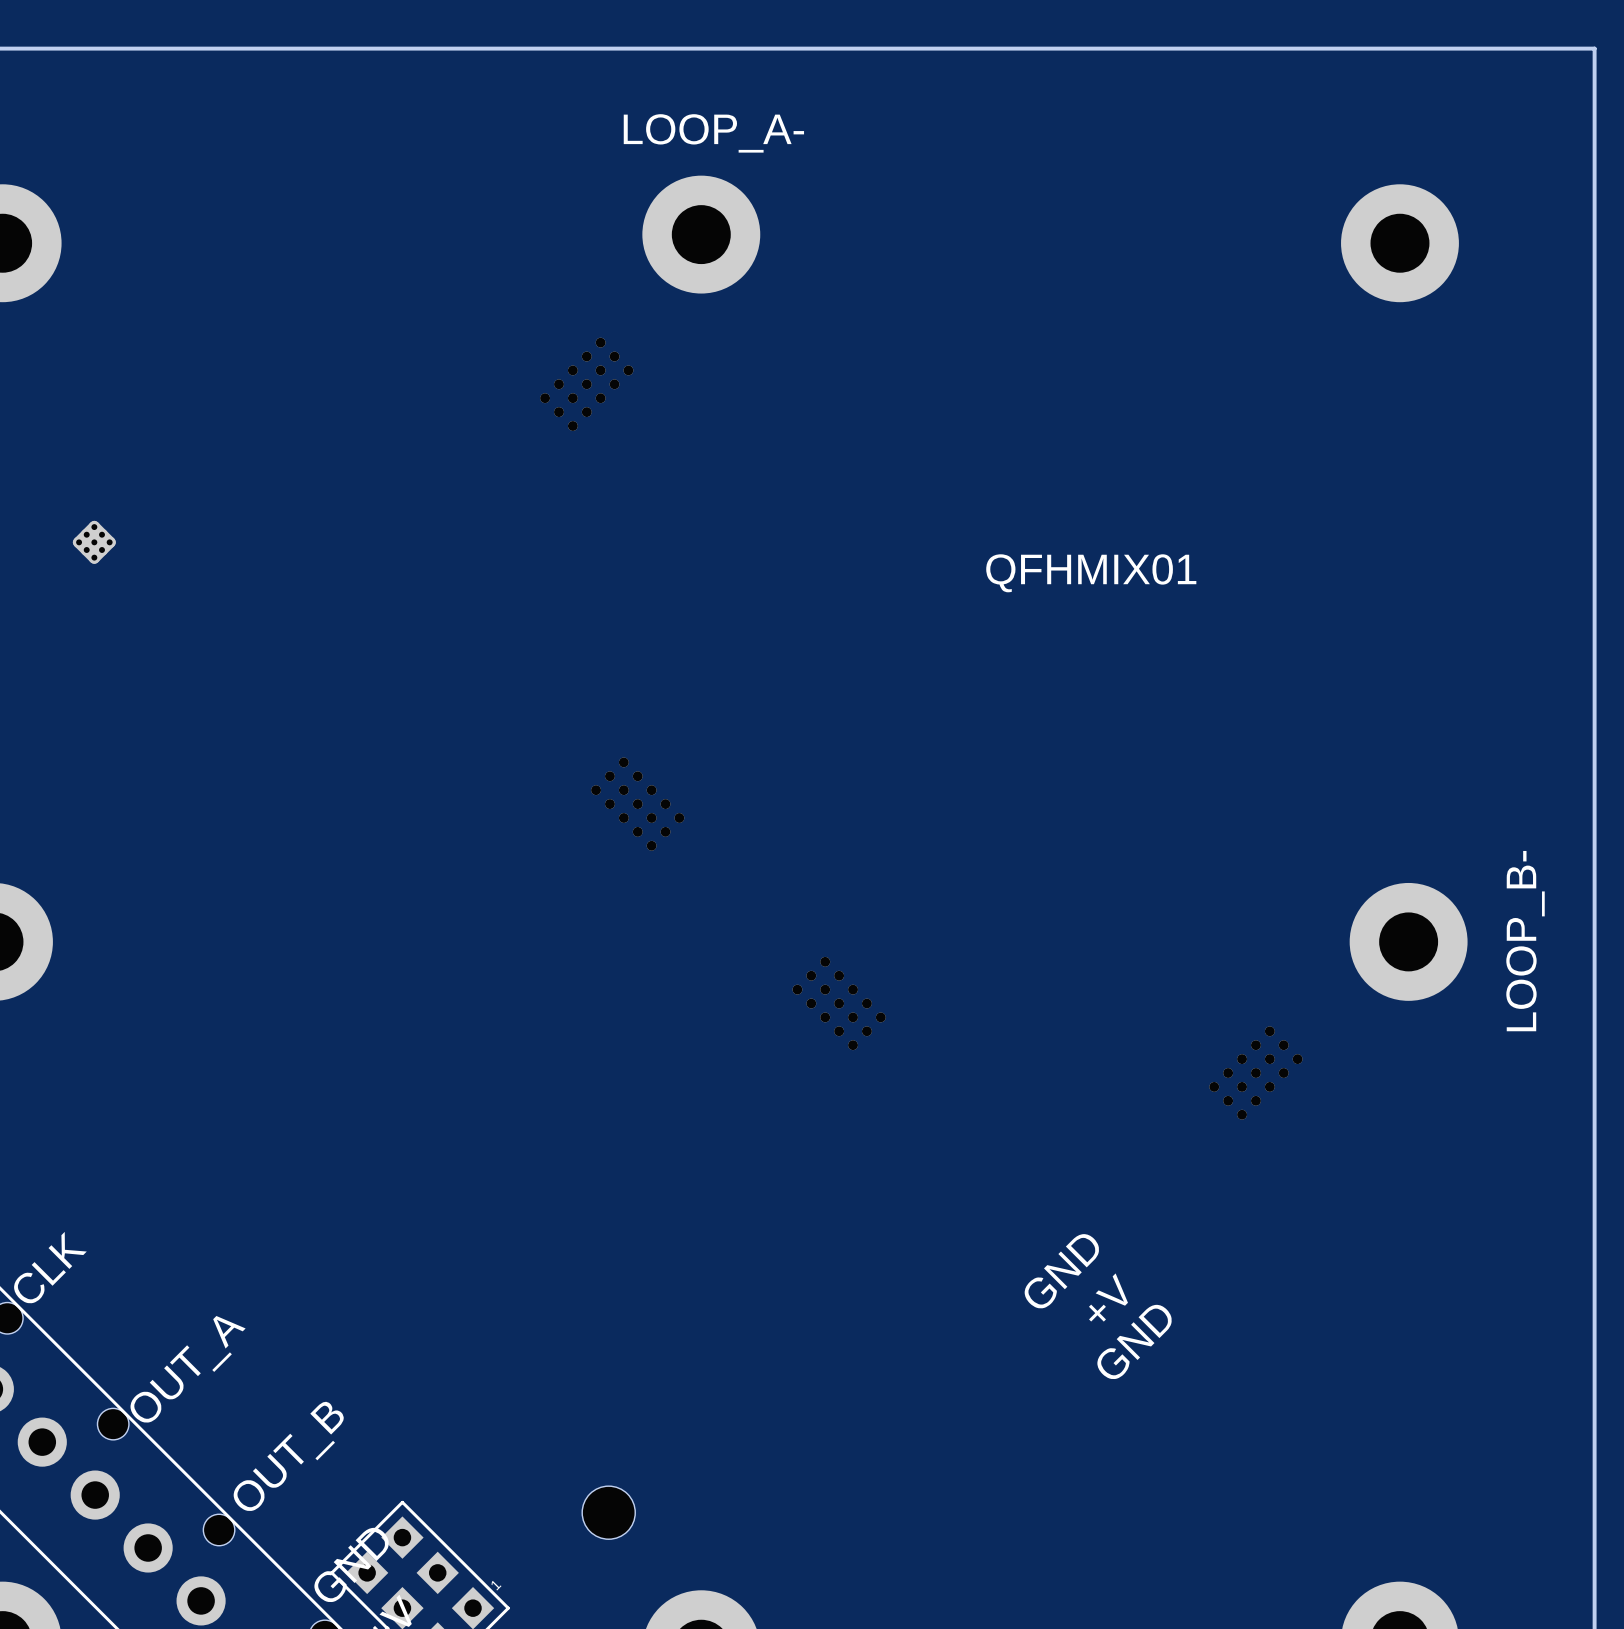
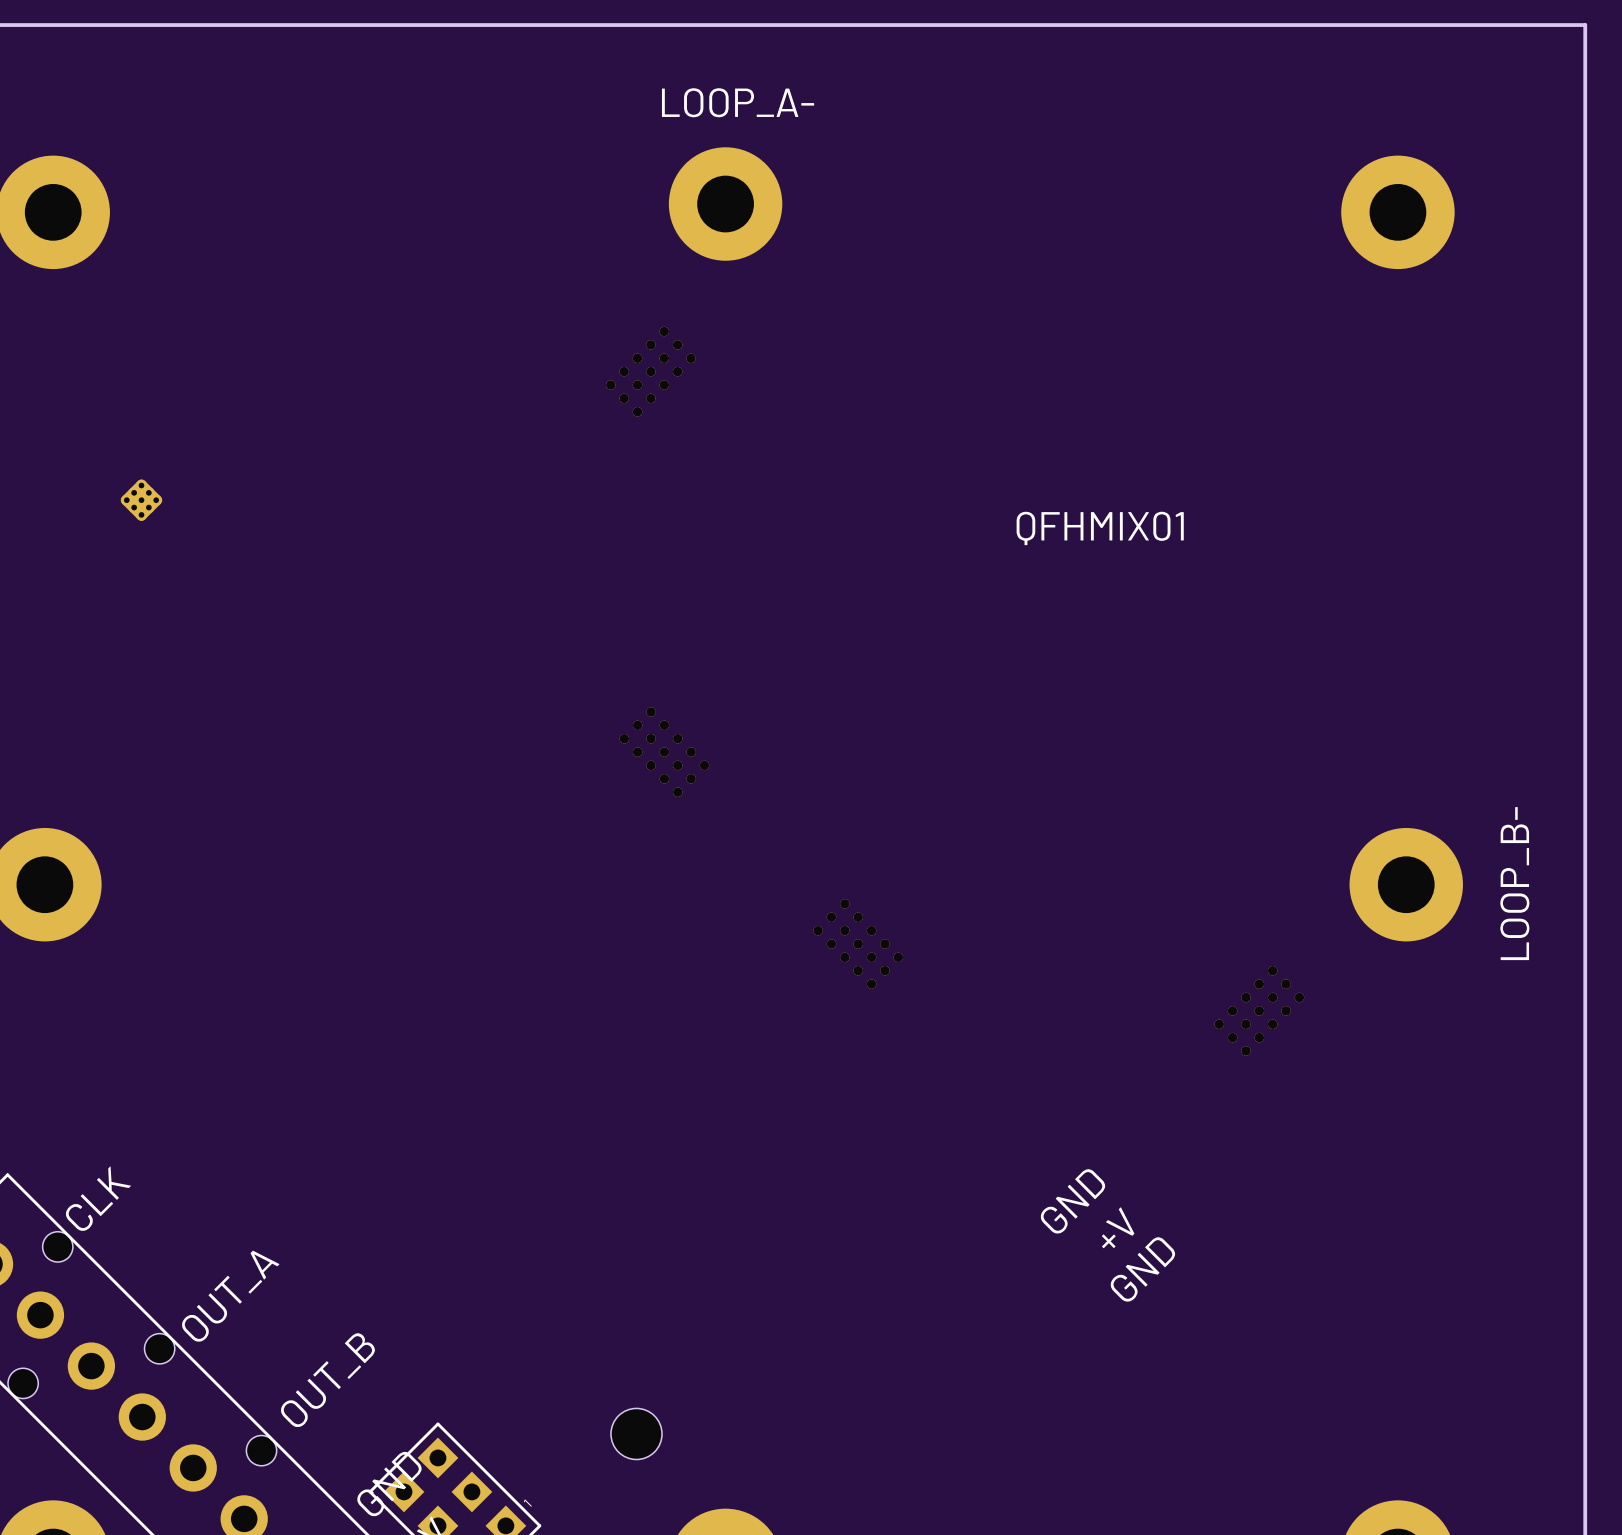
part position: (586, 384) -> (650, 371)

